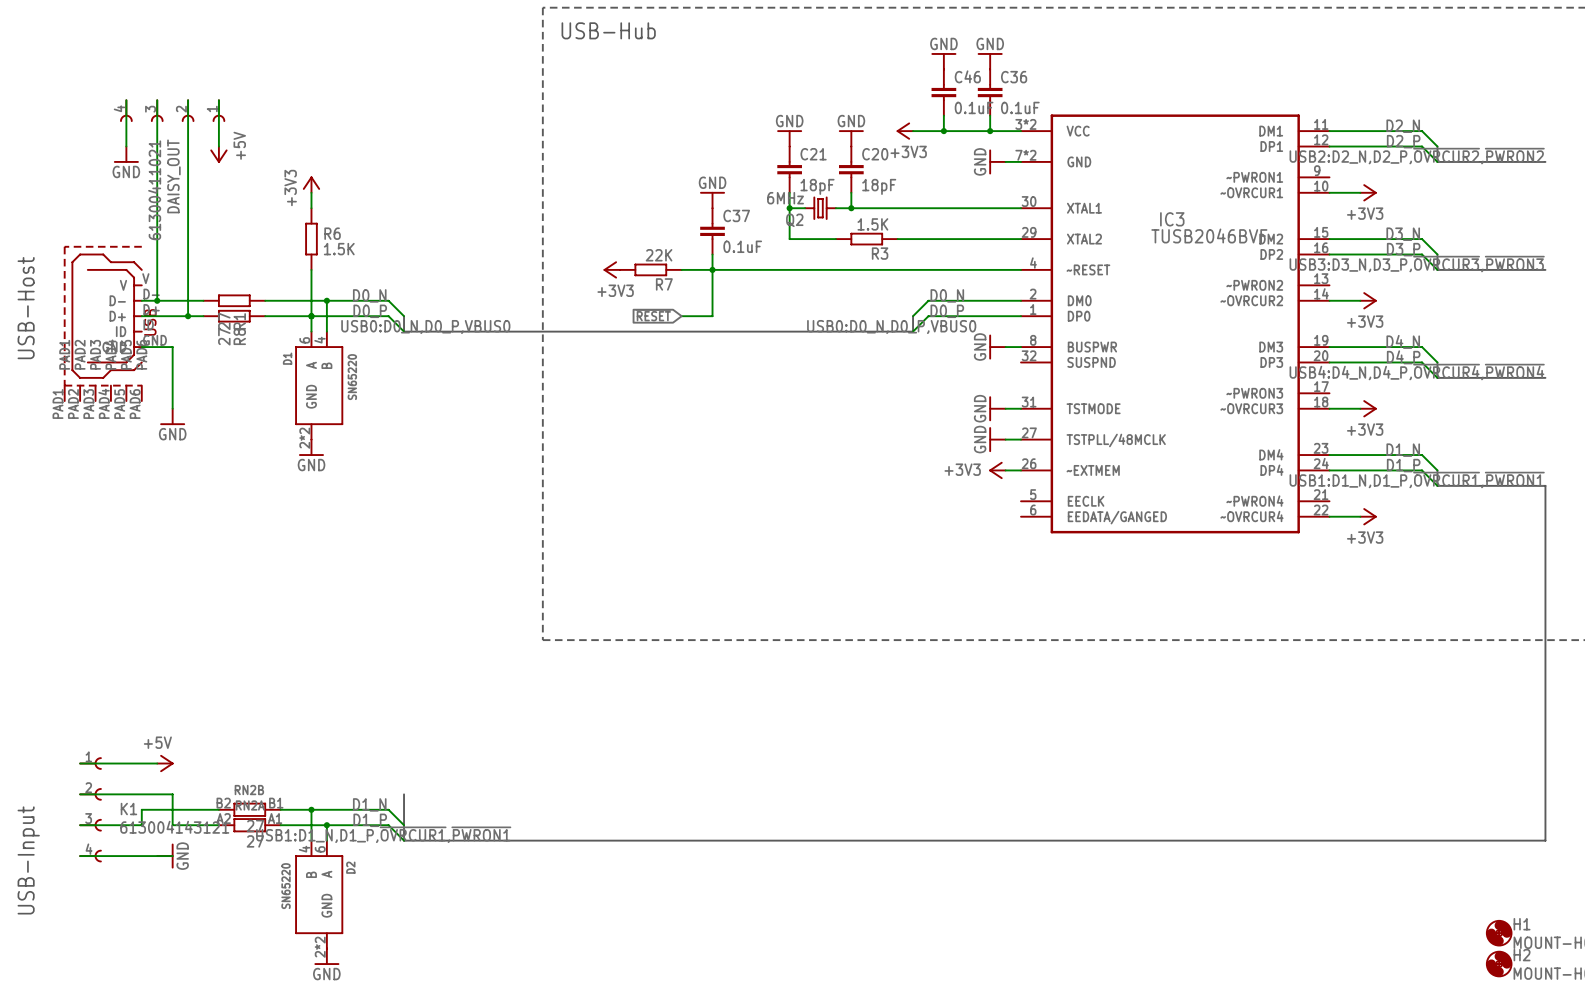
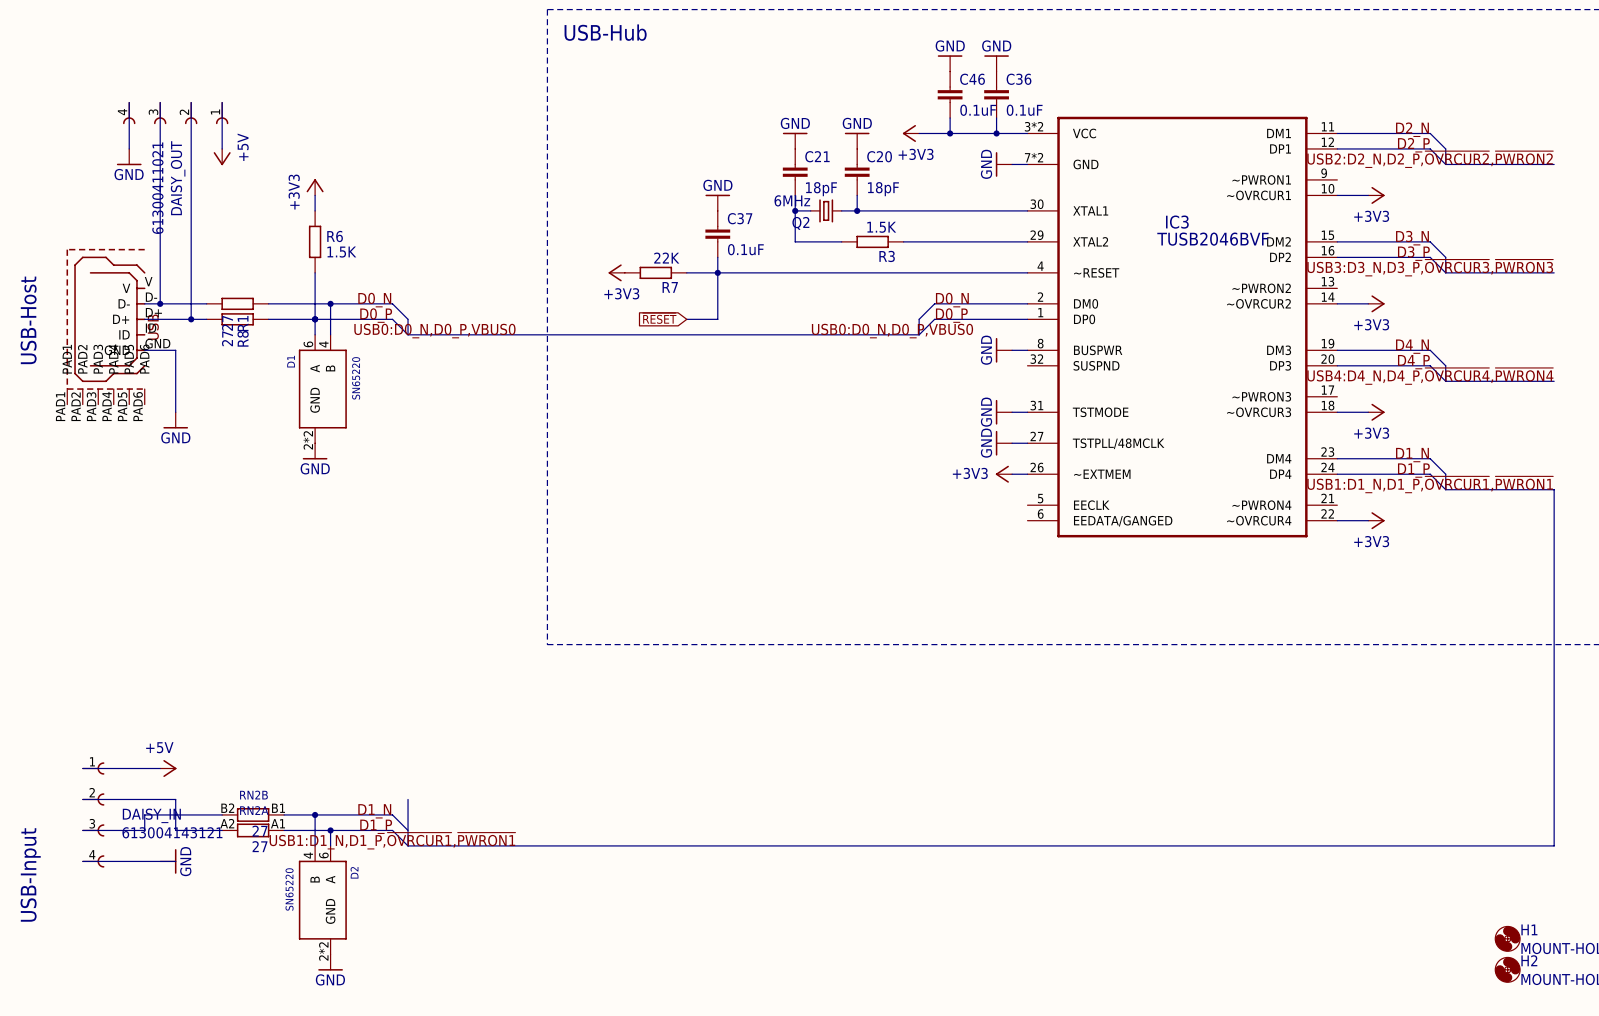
K1 name: K1 (128, 809) -> DAISY_IN (151, 815)

